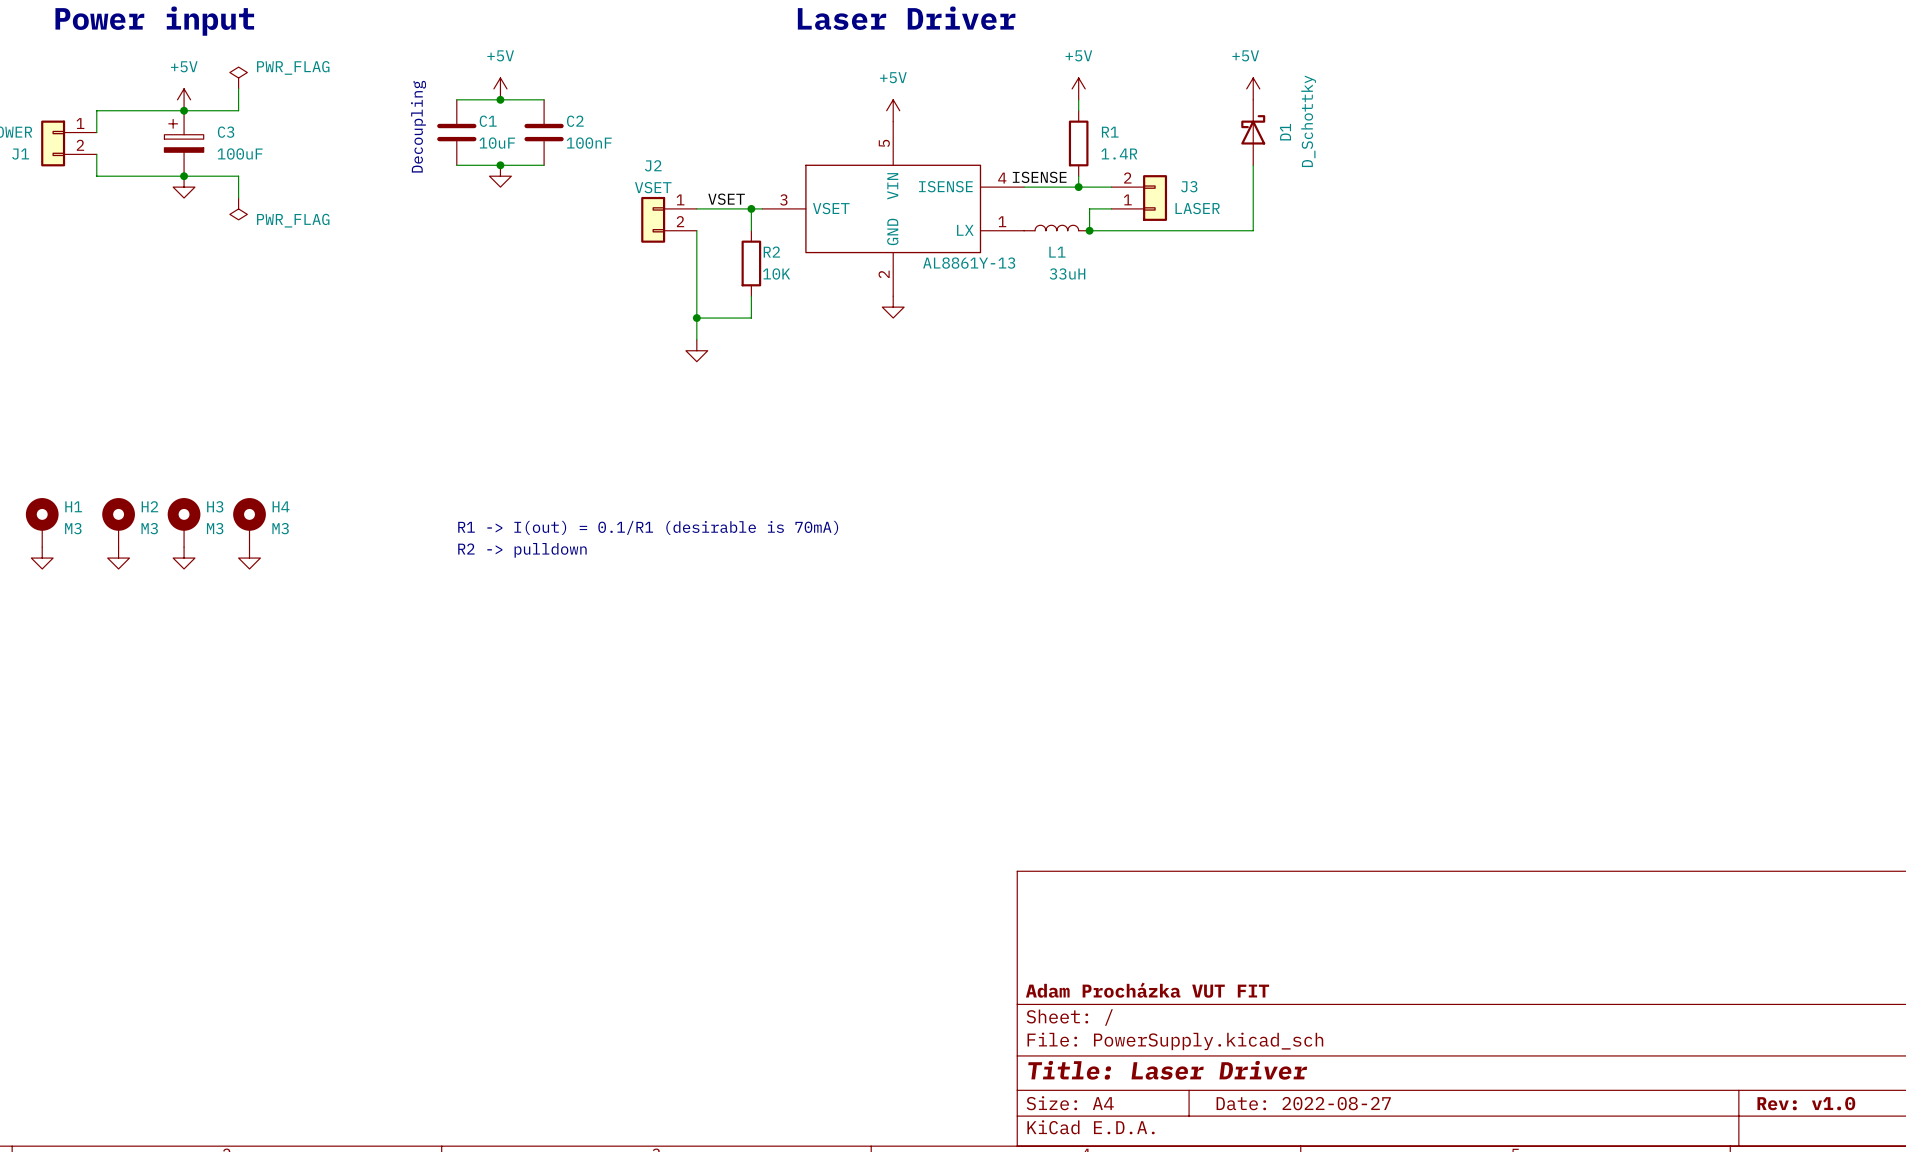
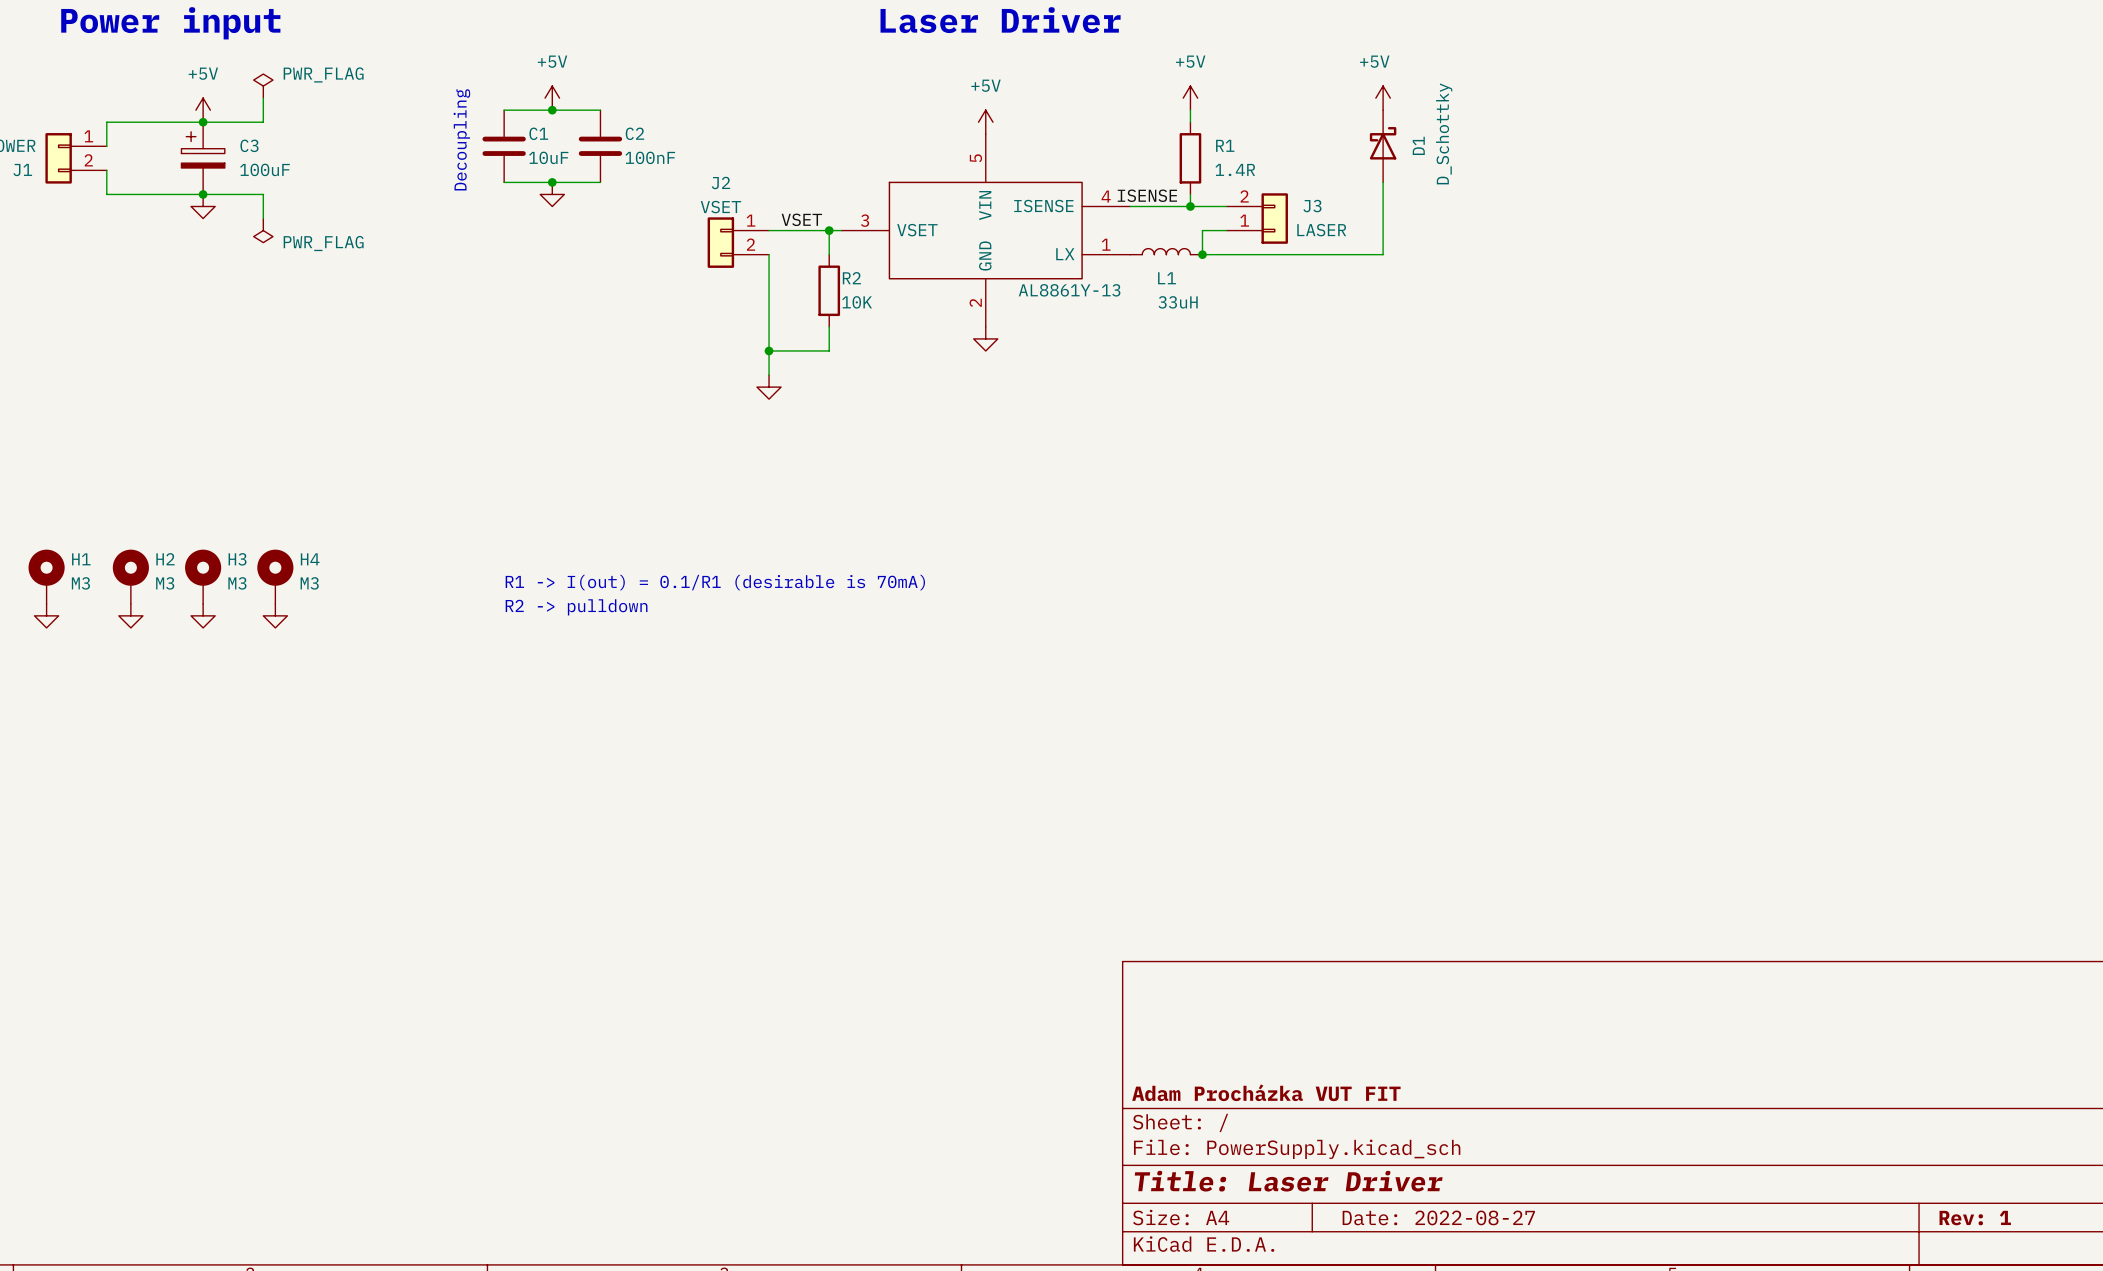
title block: Rev: v1.0 (1806, 1103) -> Rev: 1 (1975, 1218)

